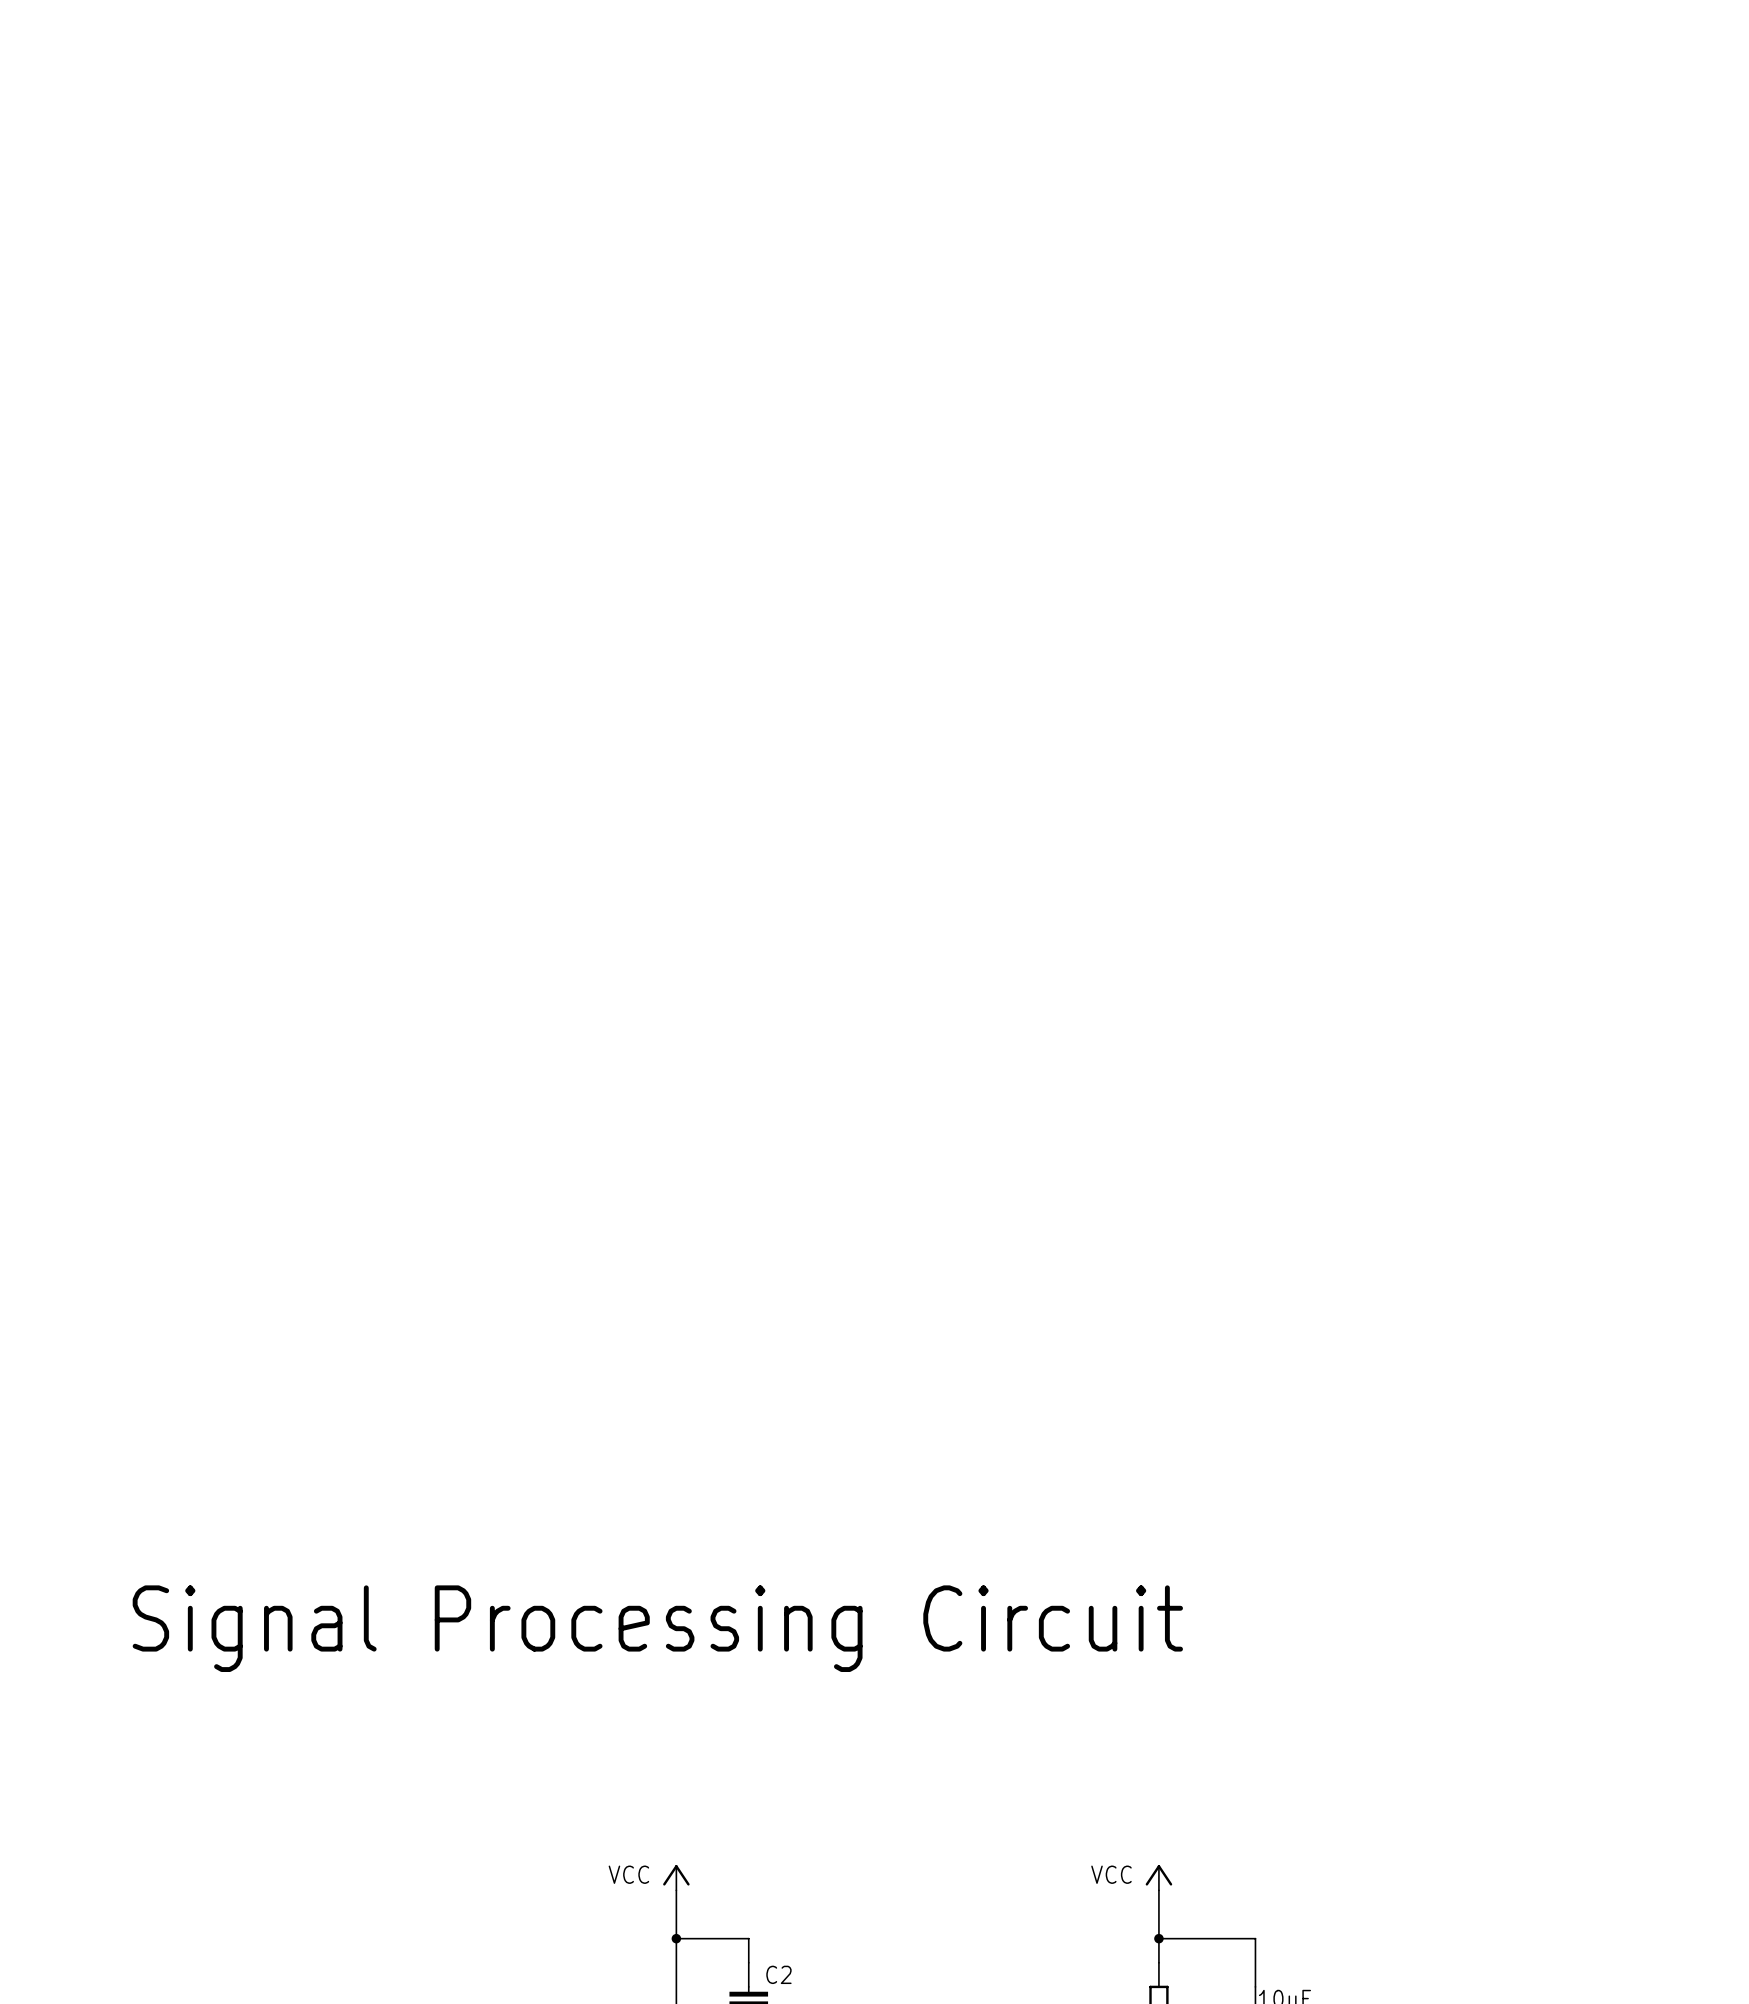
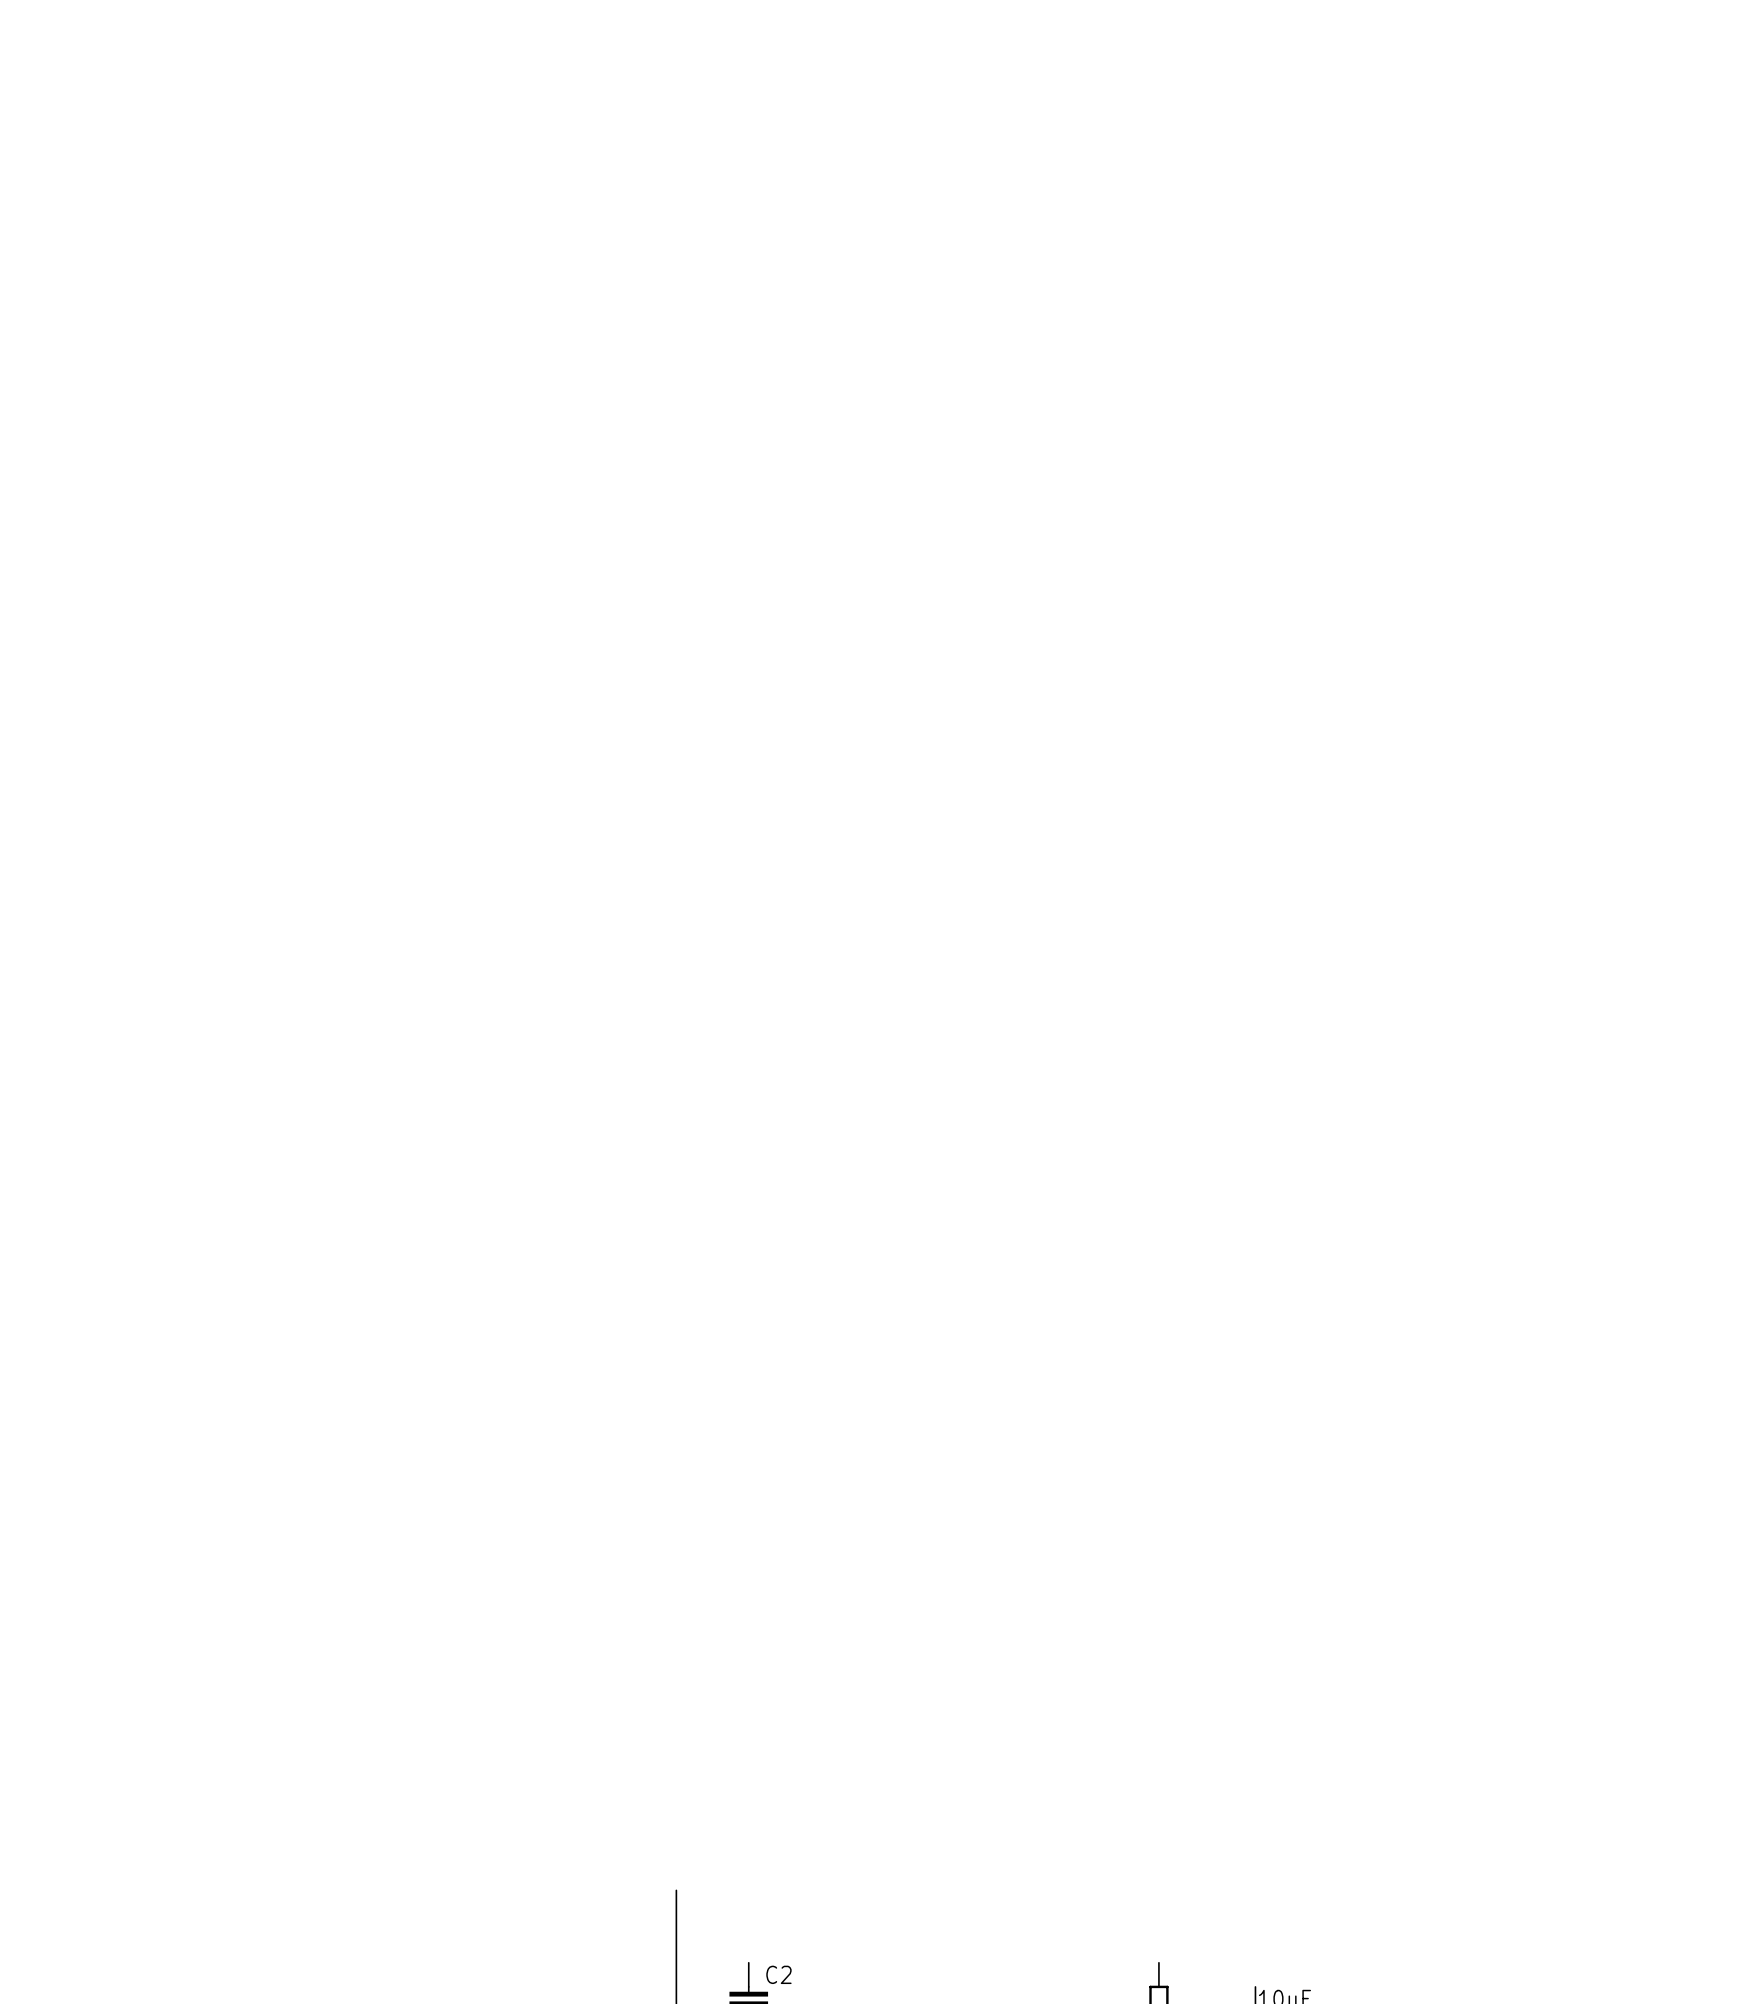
text: Signal Processing Circuit (657, 1628) -> none
power symbol: VCC (676, 1877) -> none
power symbol: VCC (1158, 1877) -> none
wire: (1158, 1890) (1158, 1962) -> none
wire: (676, 1938) (748, 1938) (748, 1962) -> none
junction: (676, 1938) -> none
wire: (1158, 1938) (1255, 1938) (1255, 1986) -> none
junction: (1158, 1938) -> none

